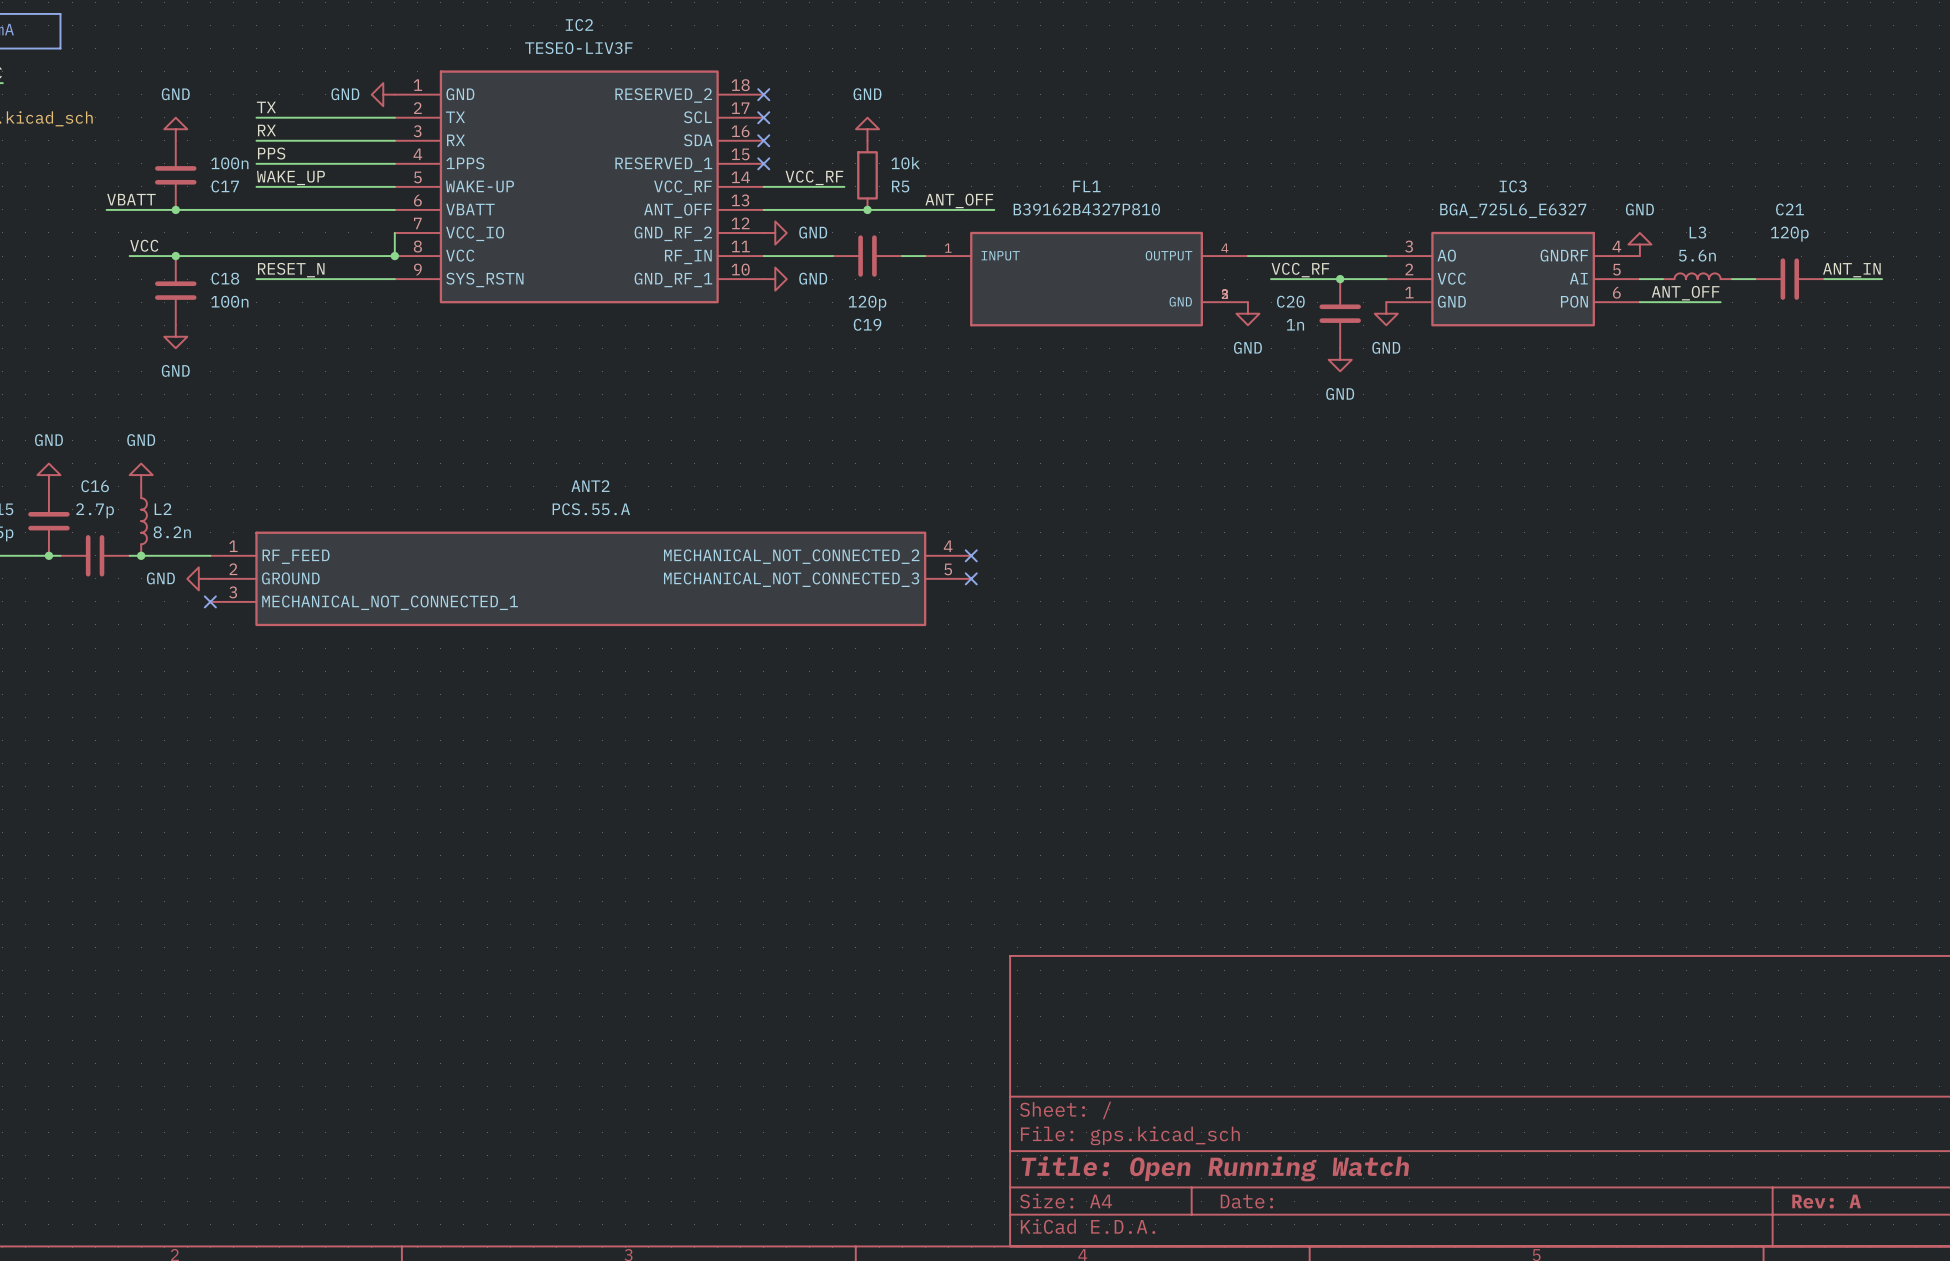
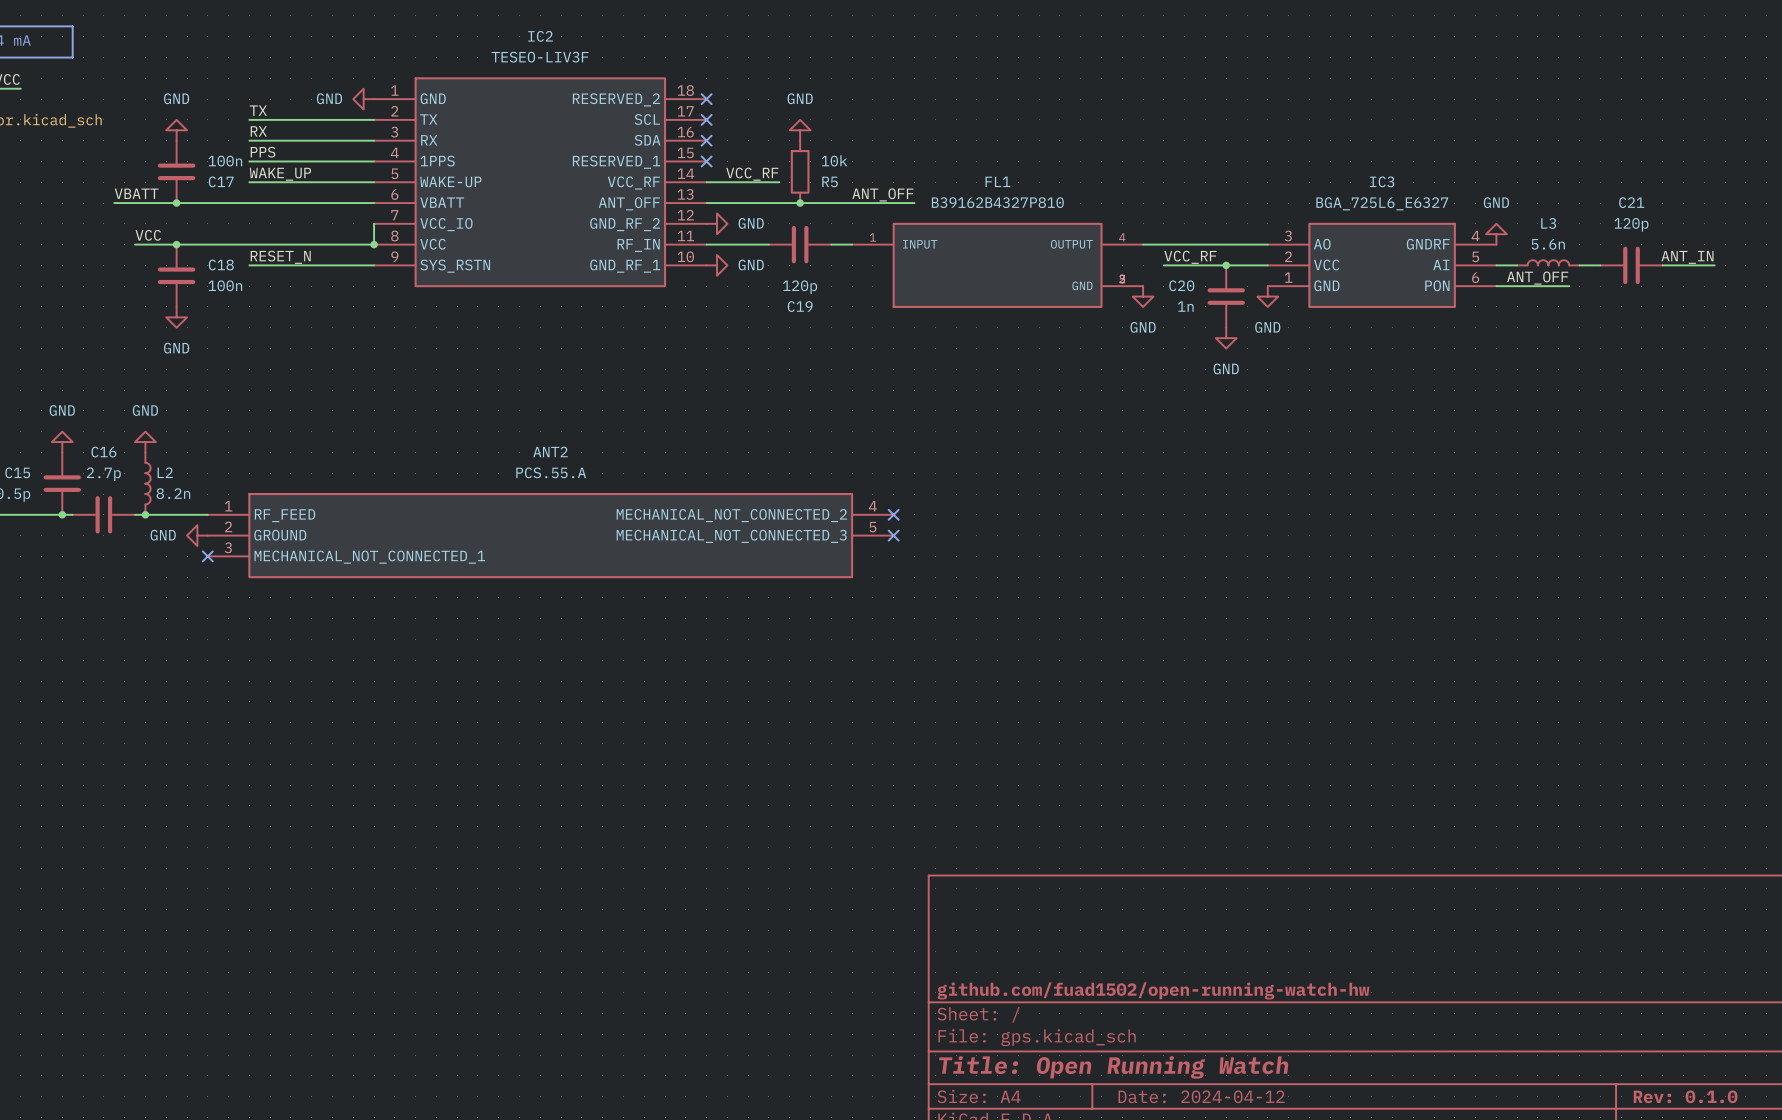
title block: none -> github.com/fuad1502/open-running-watch-hw (1153, 990)
title block: Date: (1246, 1201) -> Date: 2024-04-12 (1201, 1096)
title block: Rev: A (1826, 1201) -> Rev: 0.1.0 (1685, 1096)

